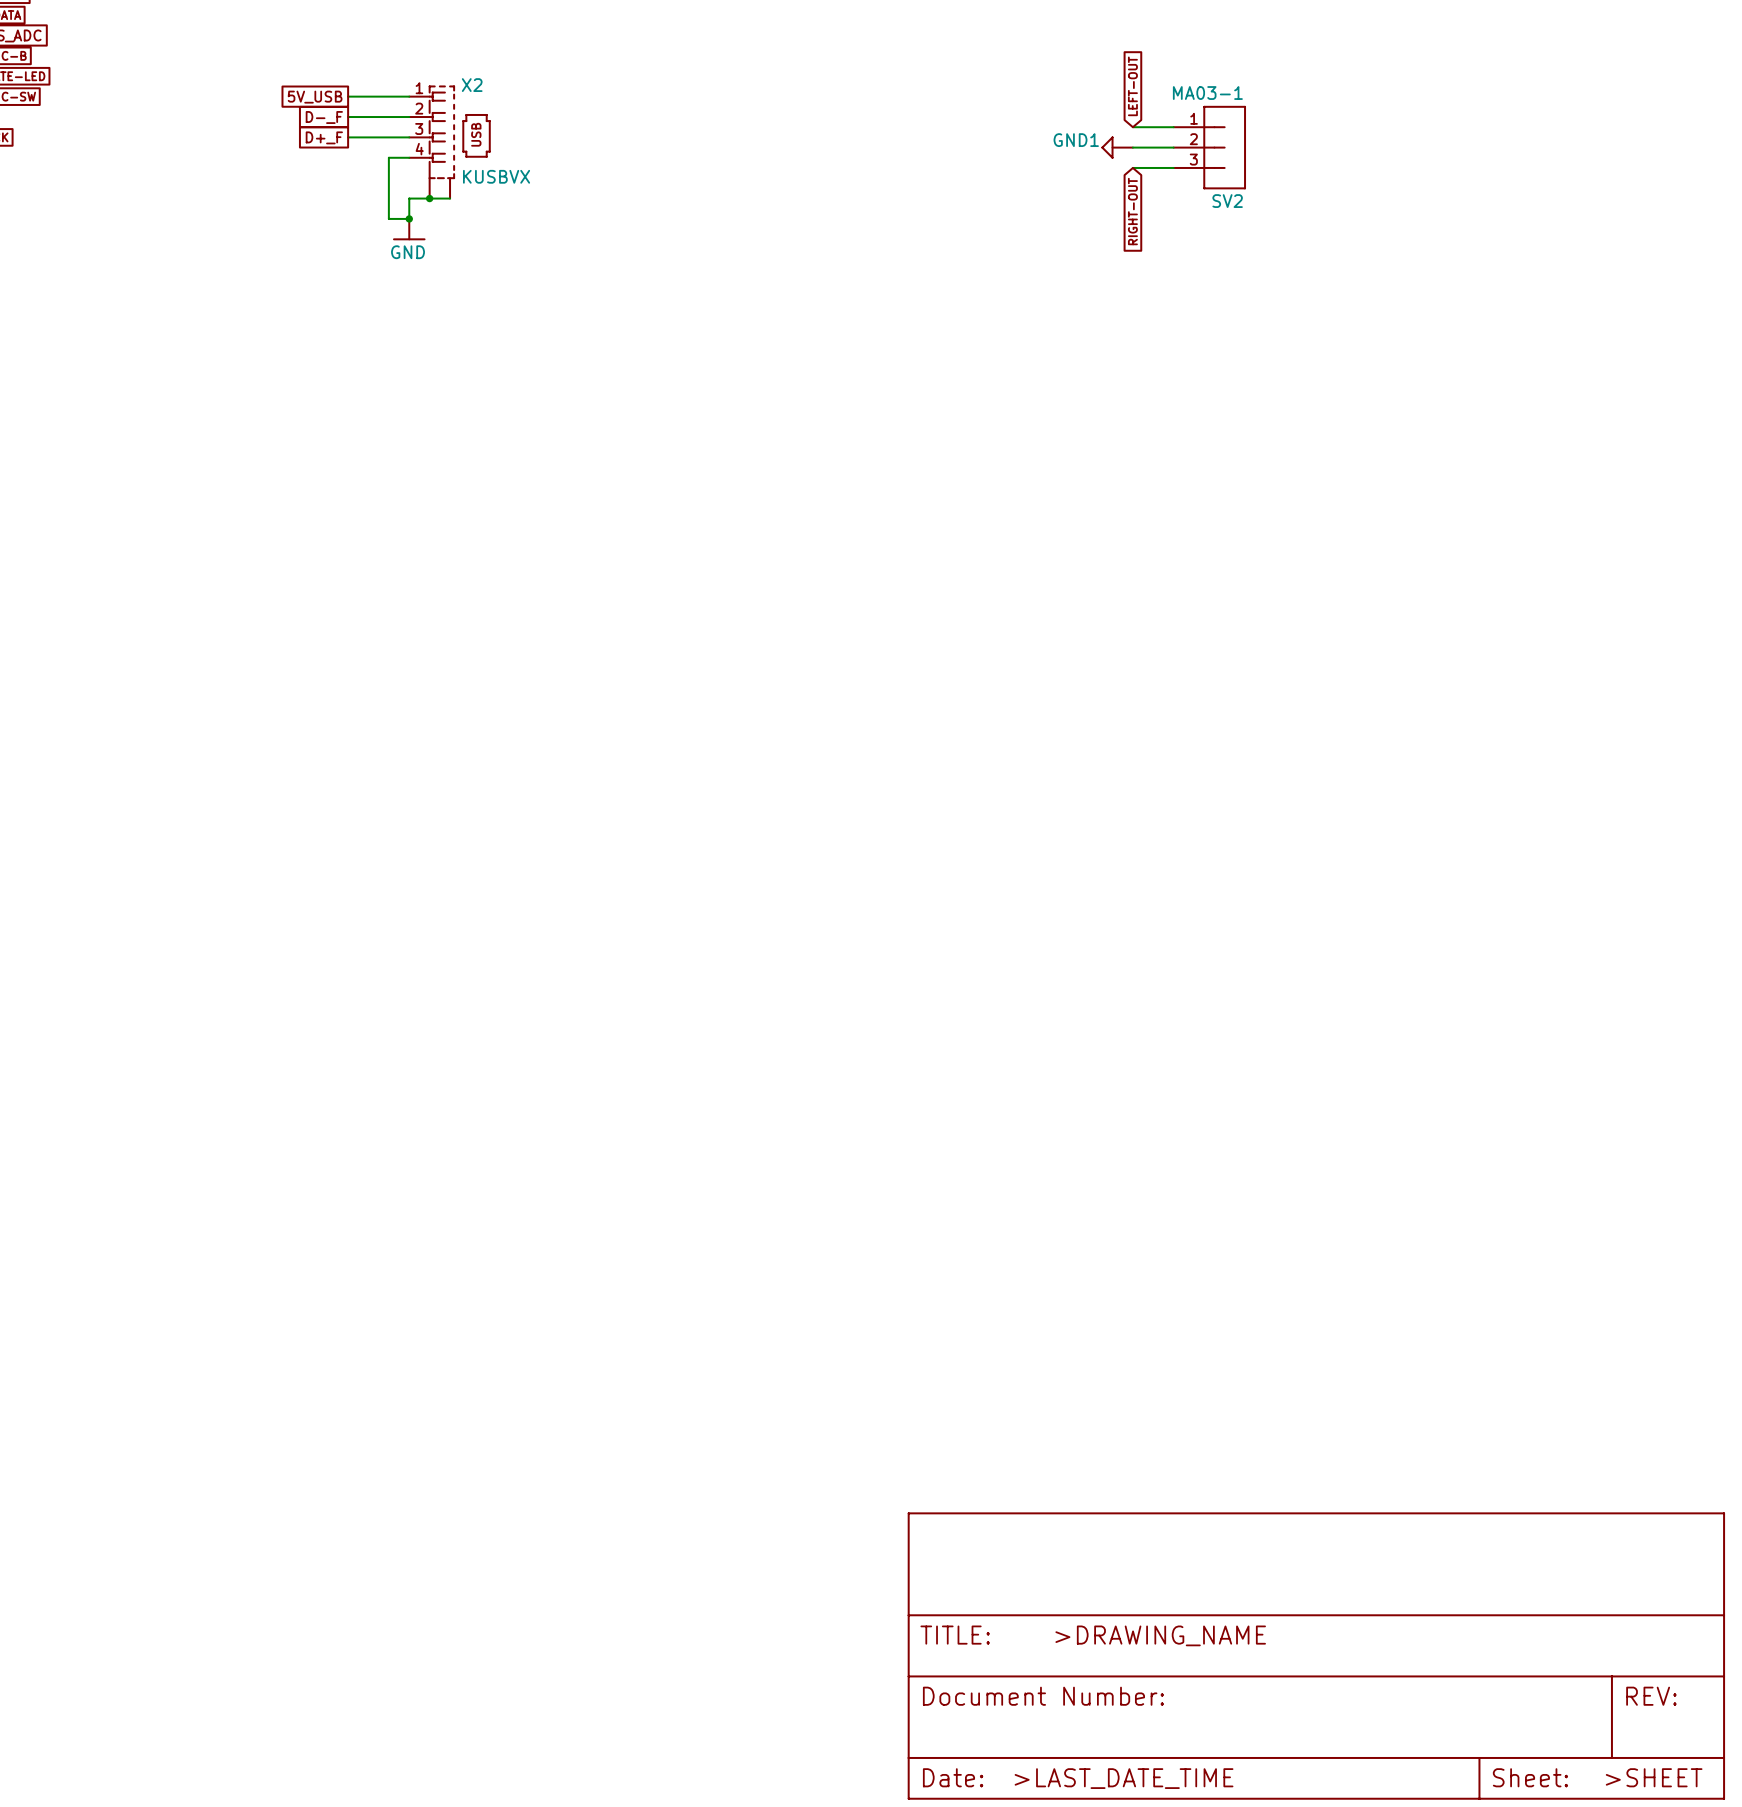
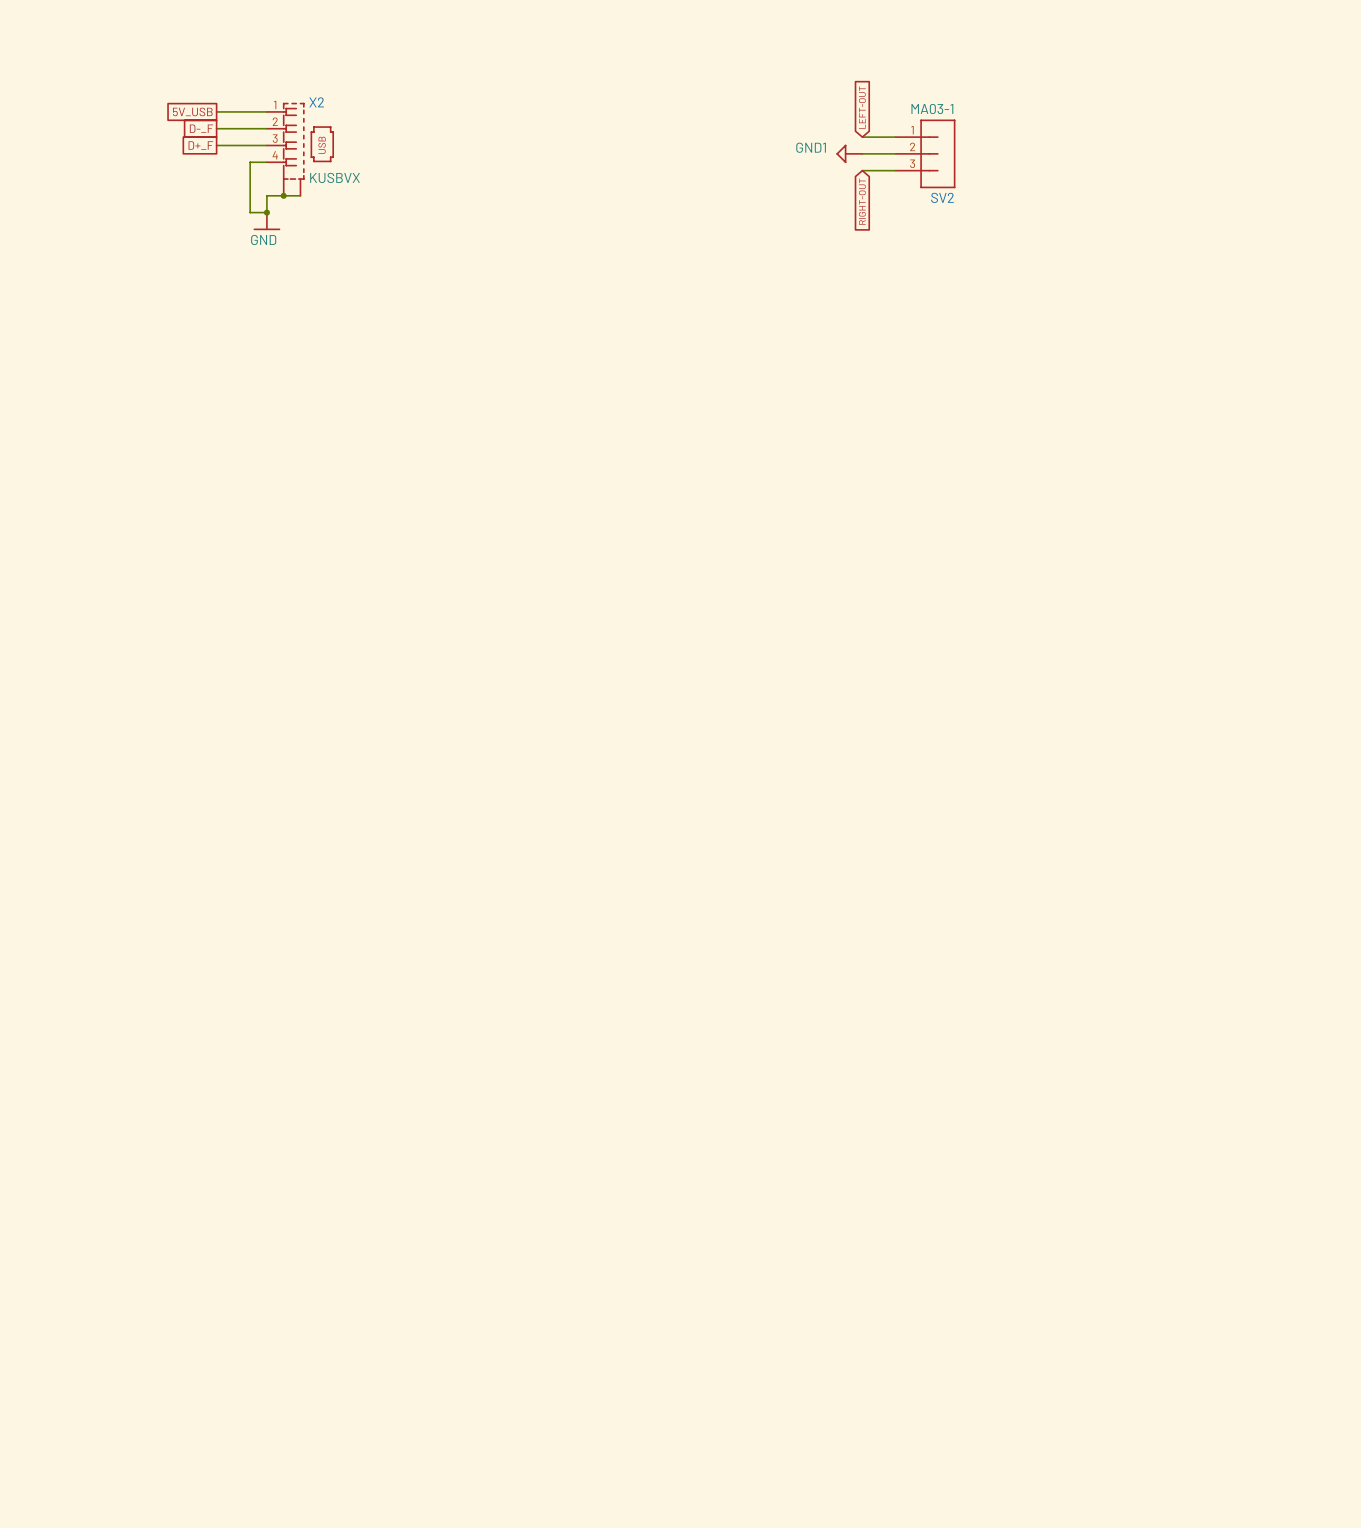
power symbol: (1316, 1656) -> none

